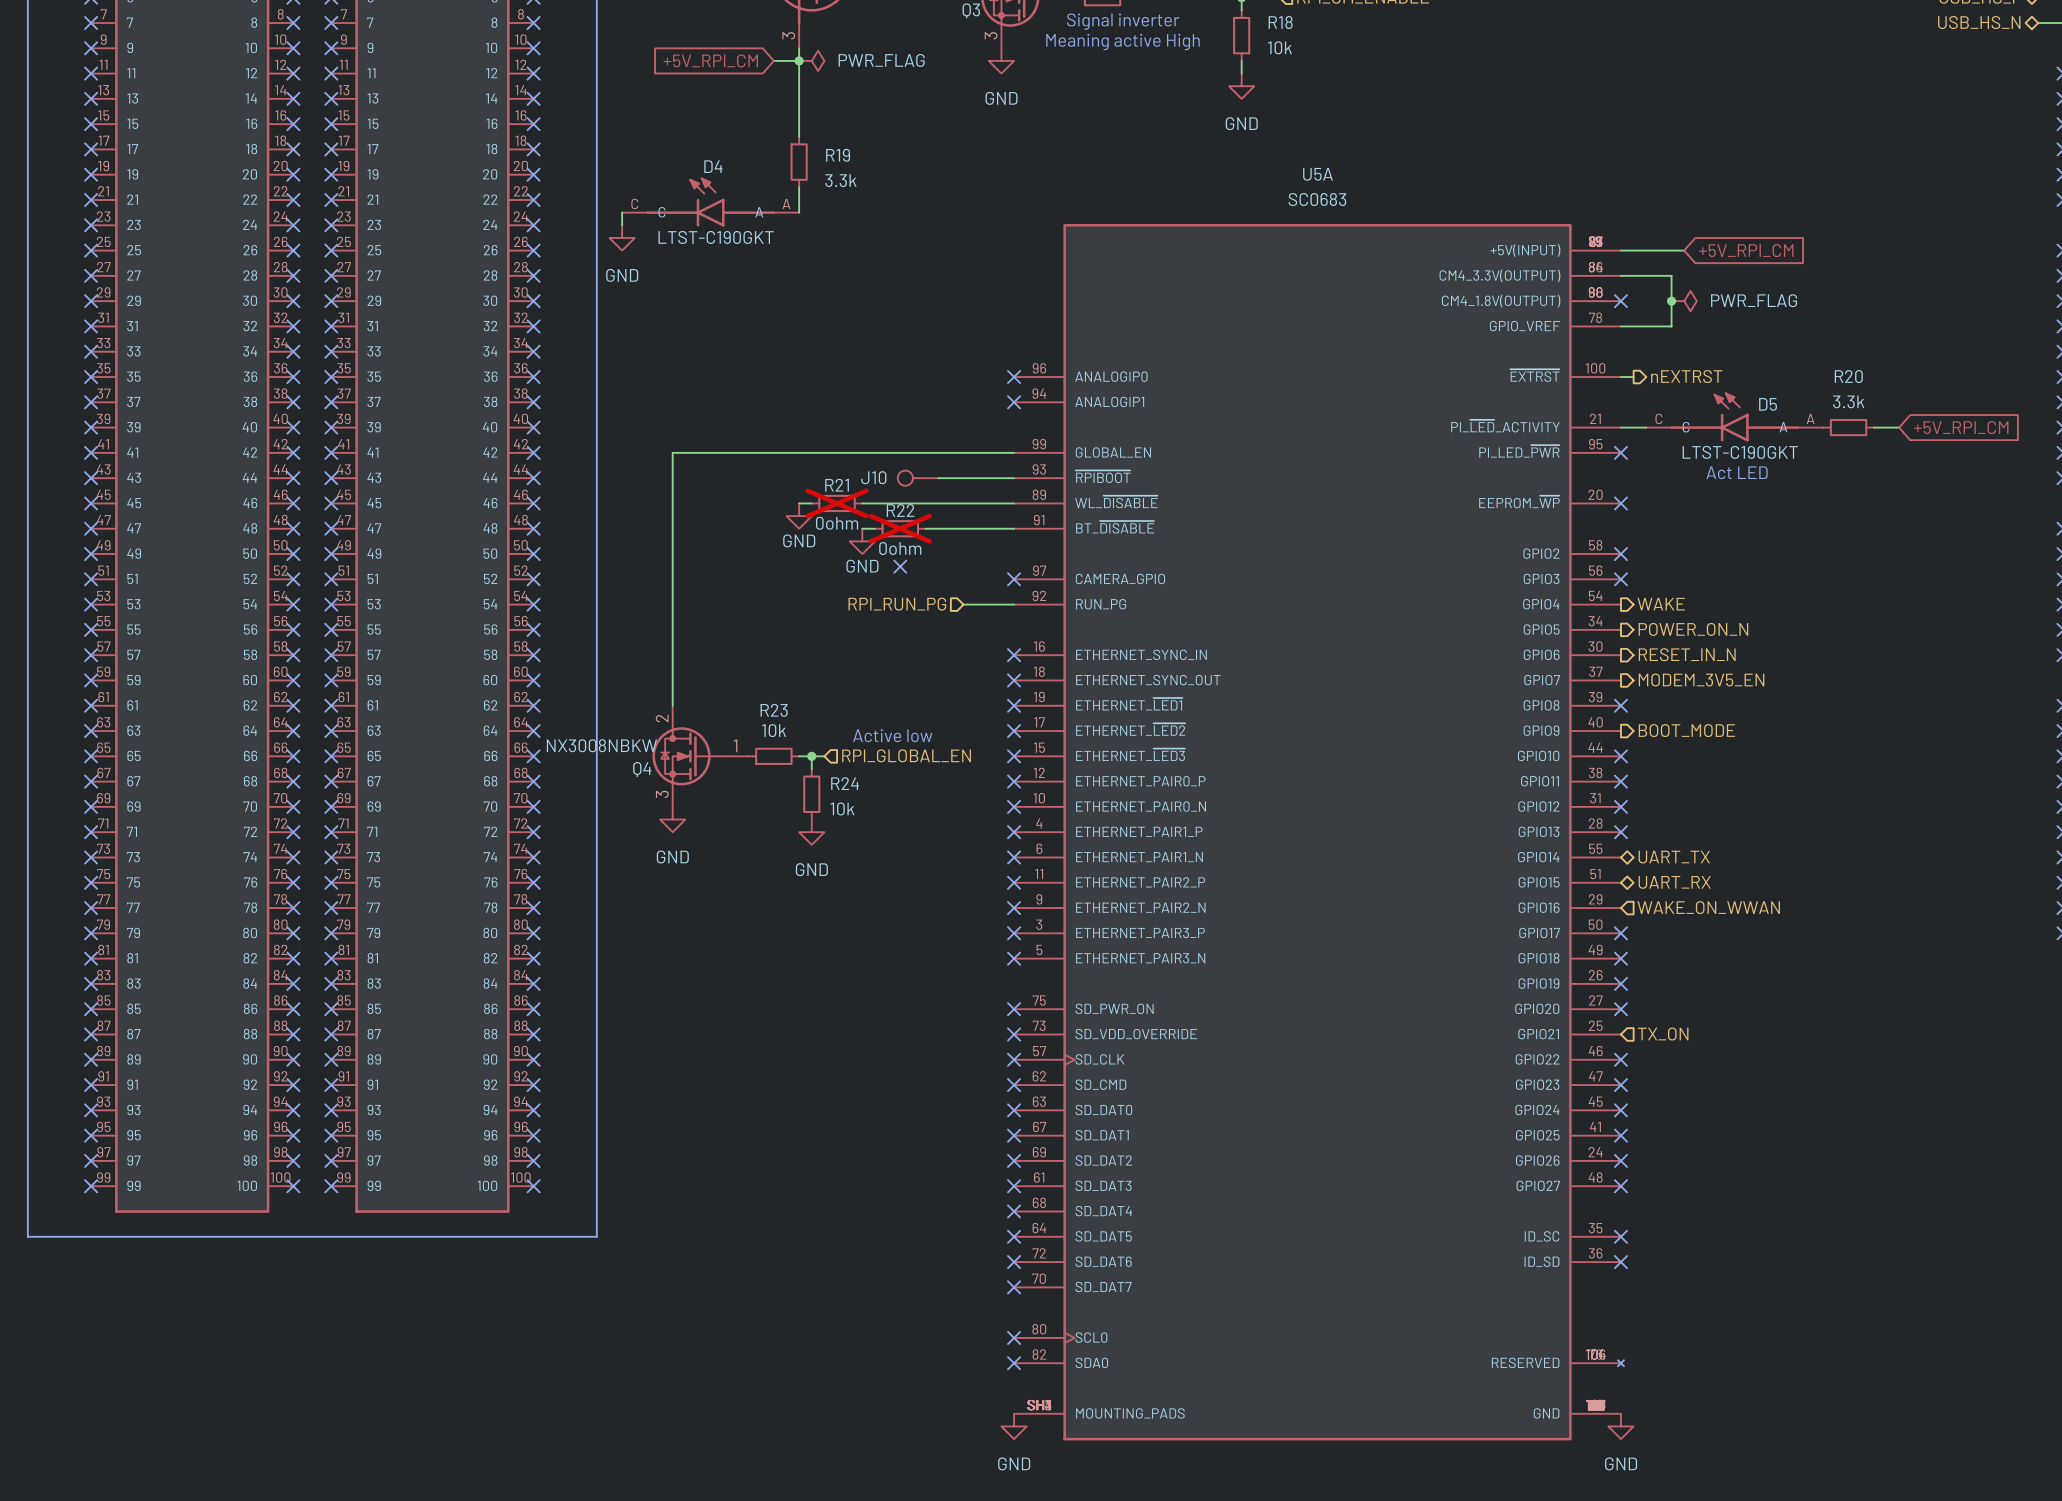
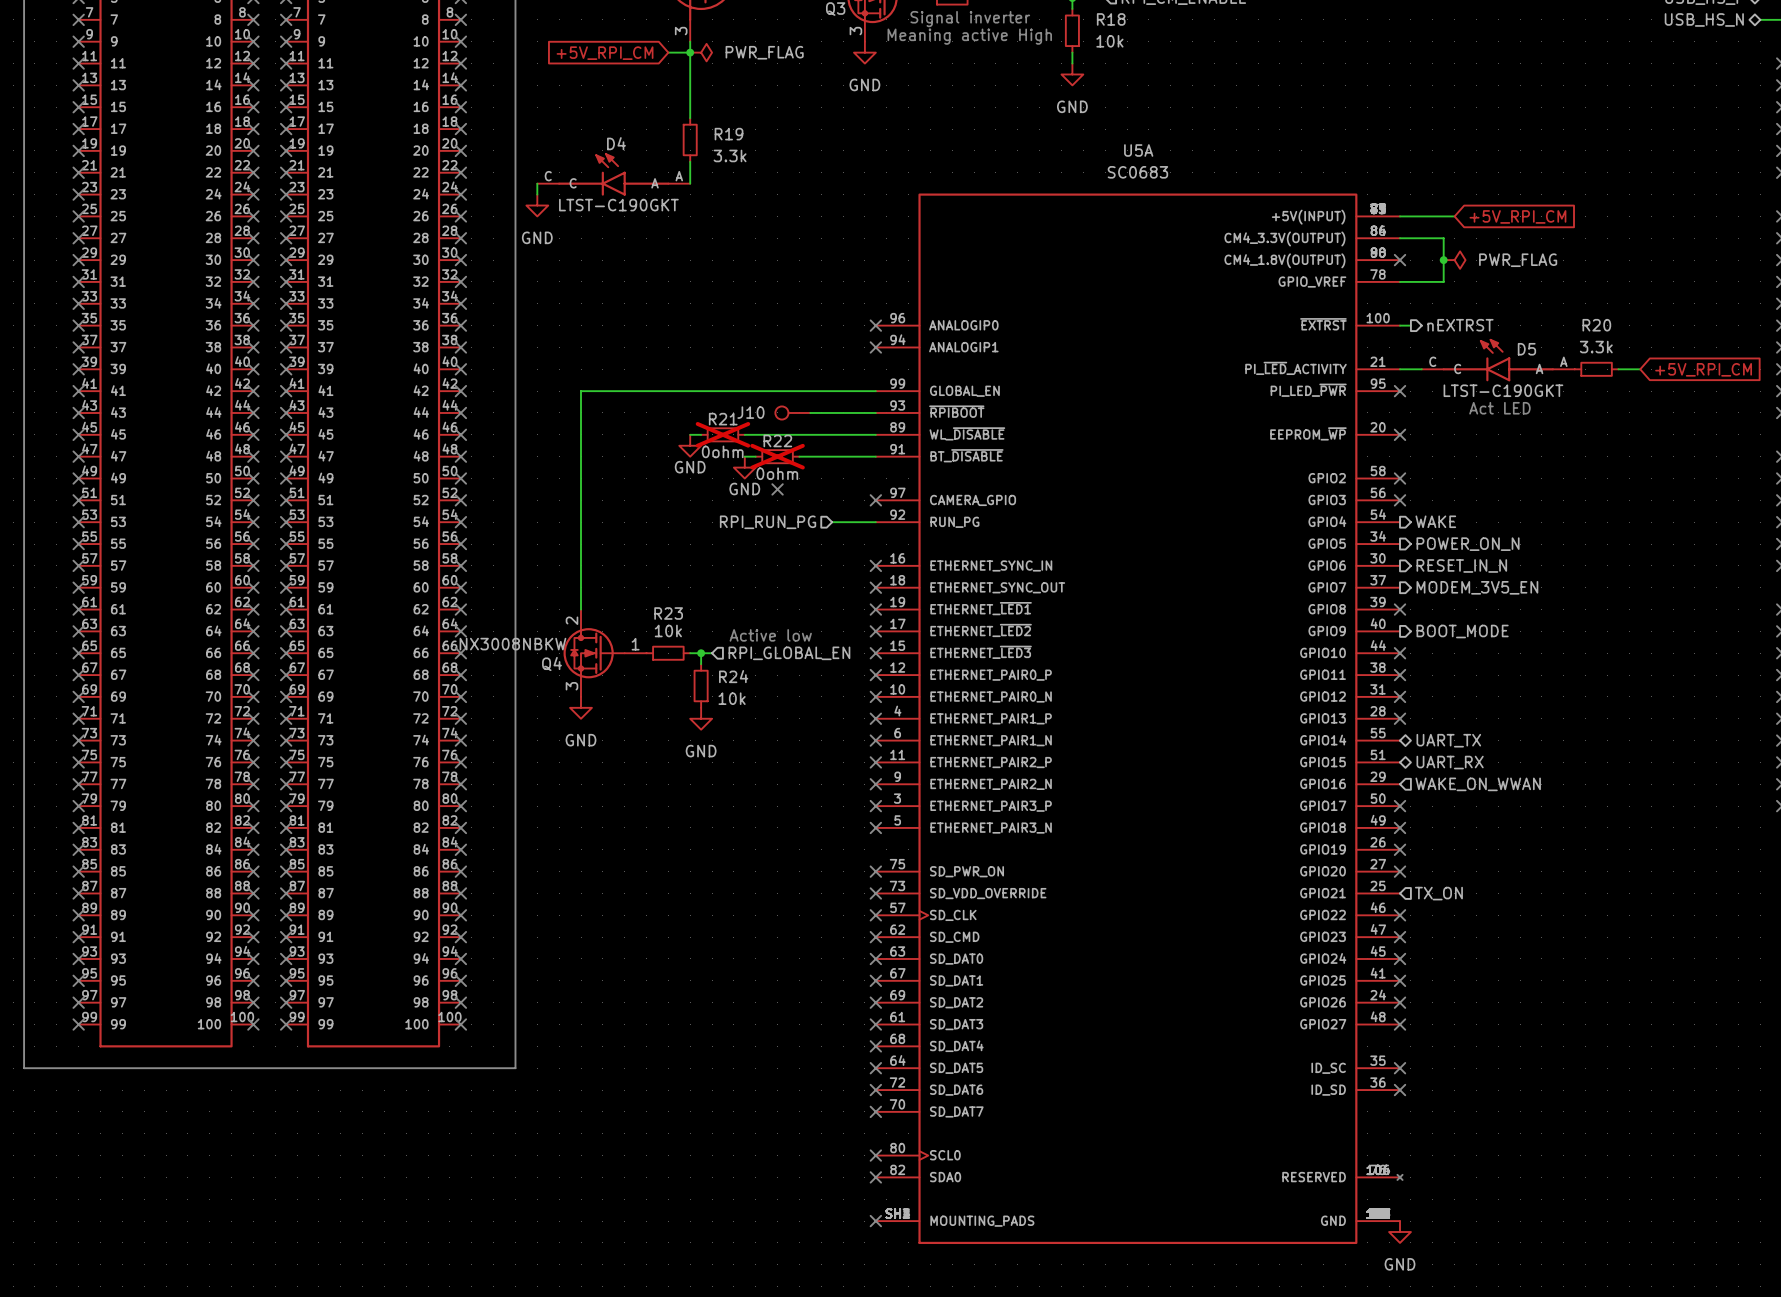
no-connect mark: none -> (875, 1221)
power symbol: GND (1014, 1426) -> none

